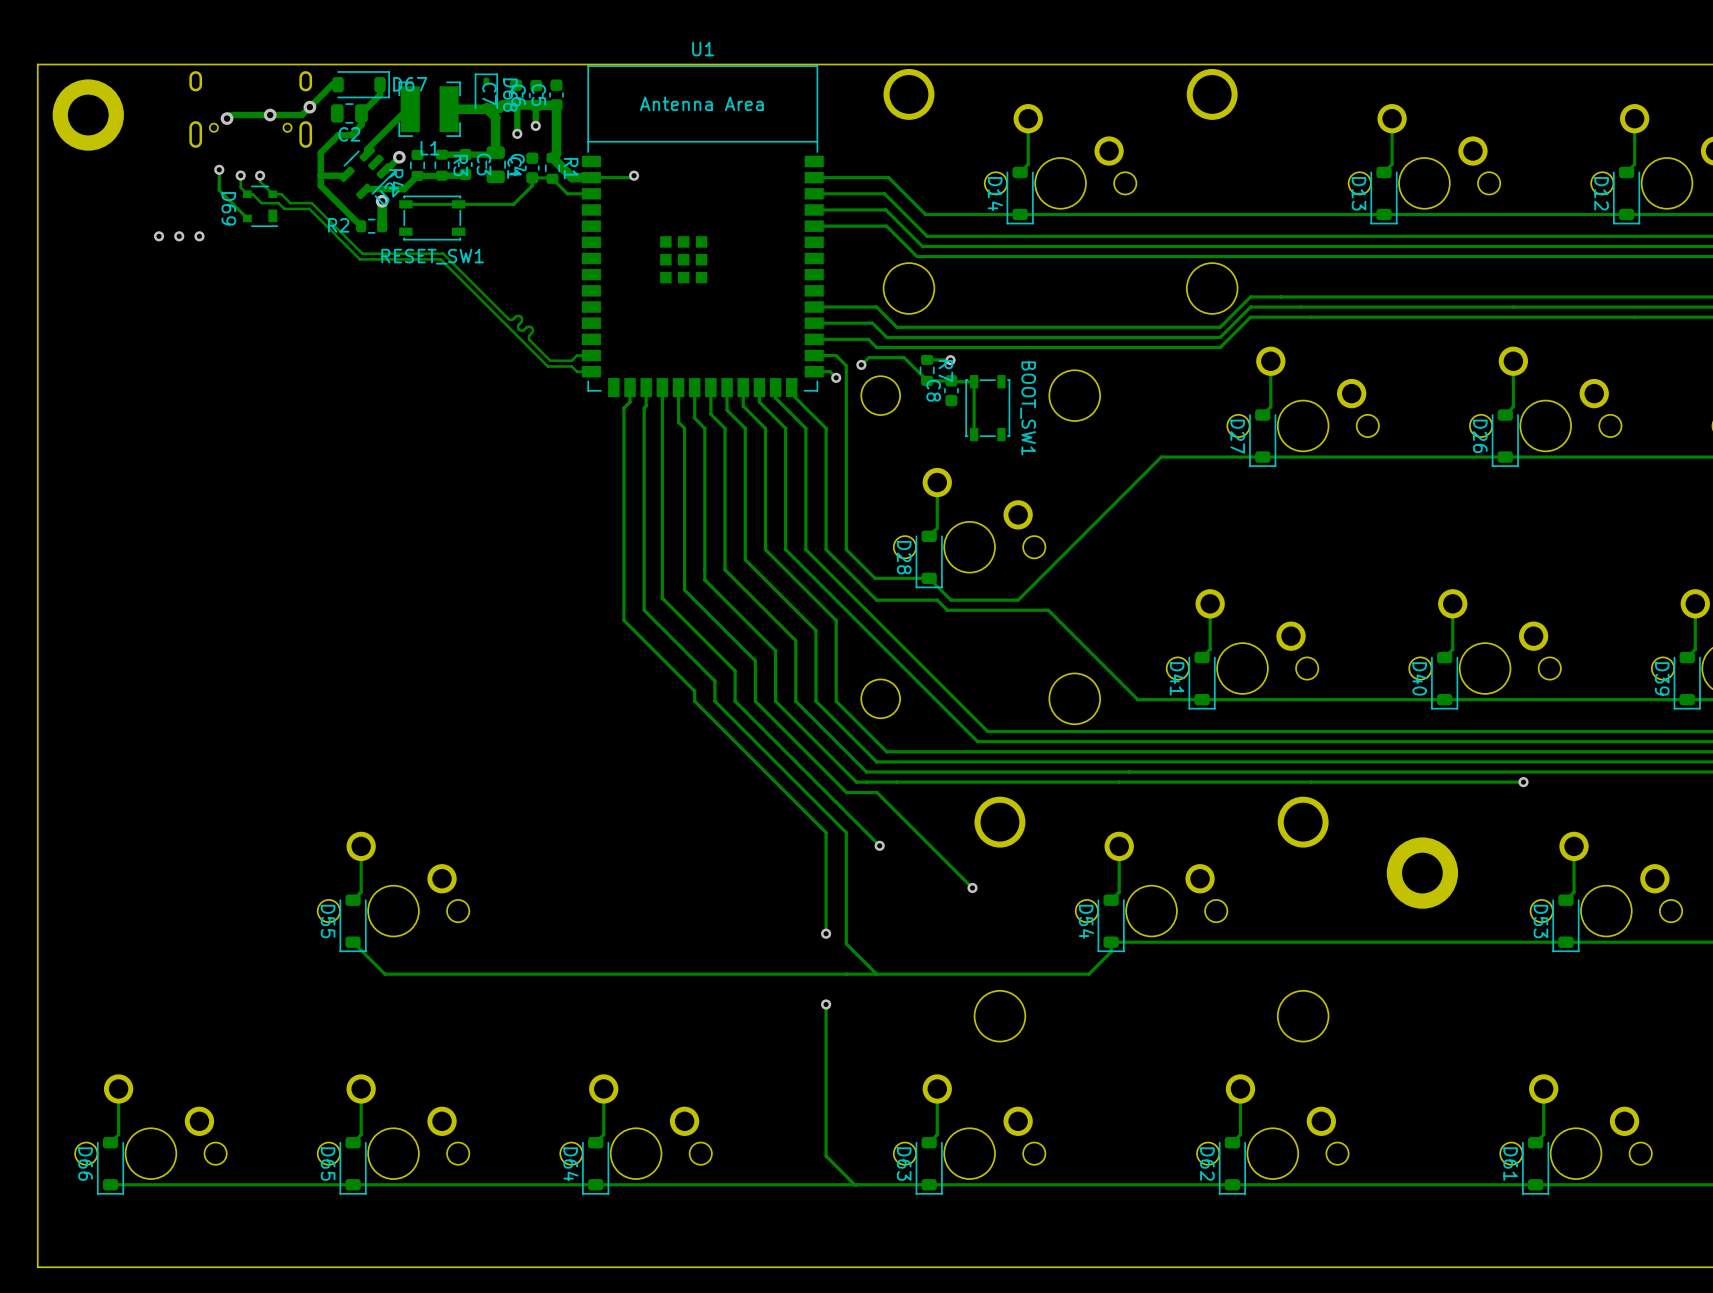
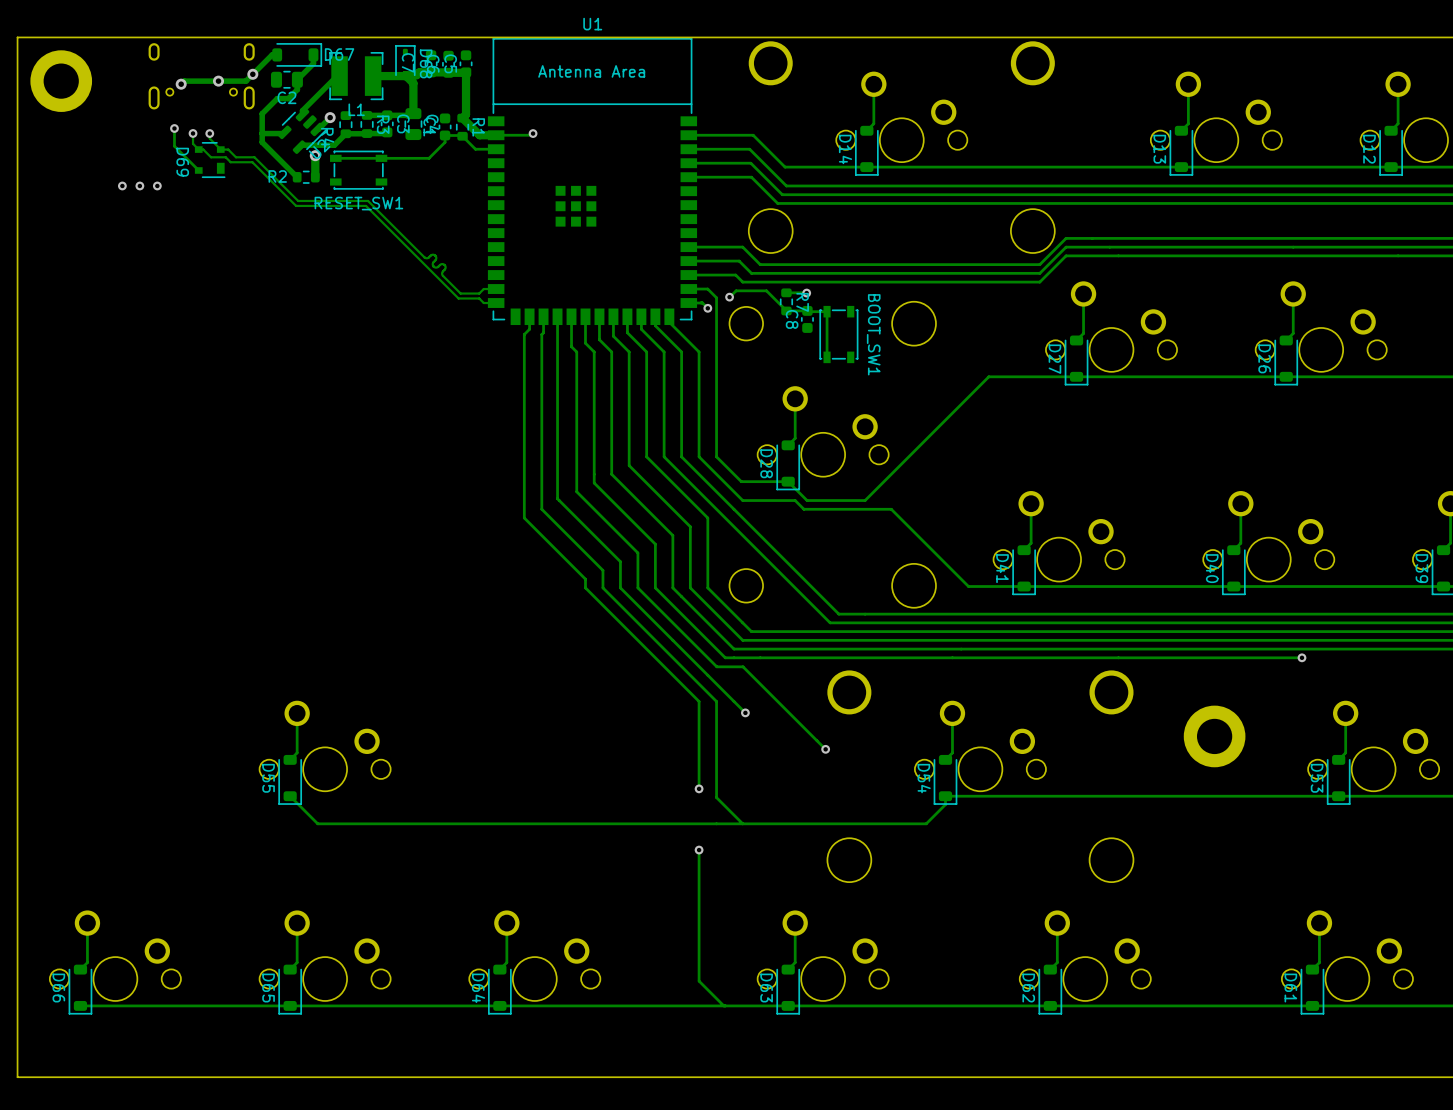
track: (516, 104) (517, 133) -> none
track: (536, 105) (535, 125) -> none
via: (535, 125) -> none
via: (517, 133) -> none

